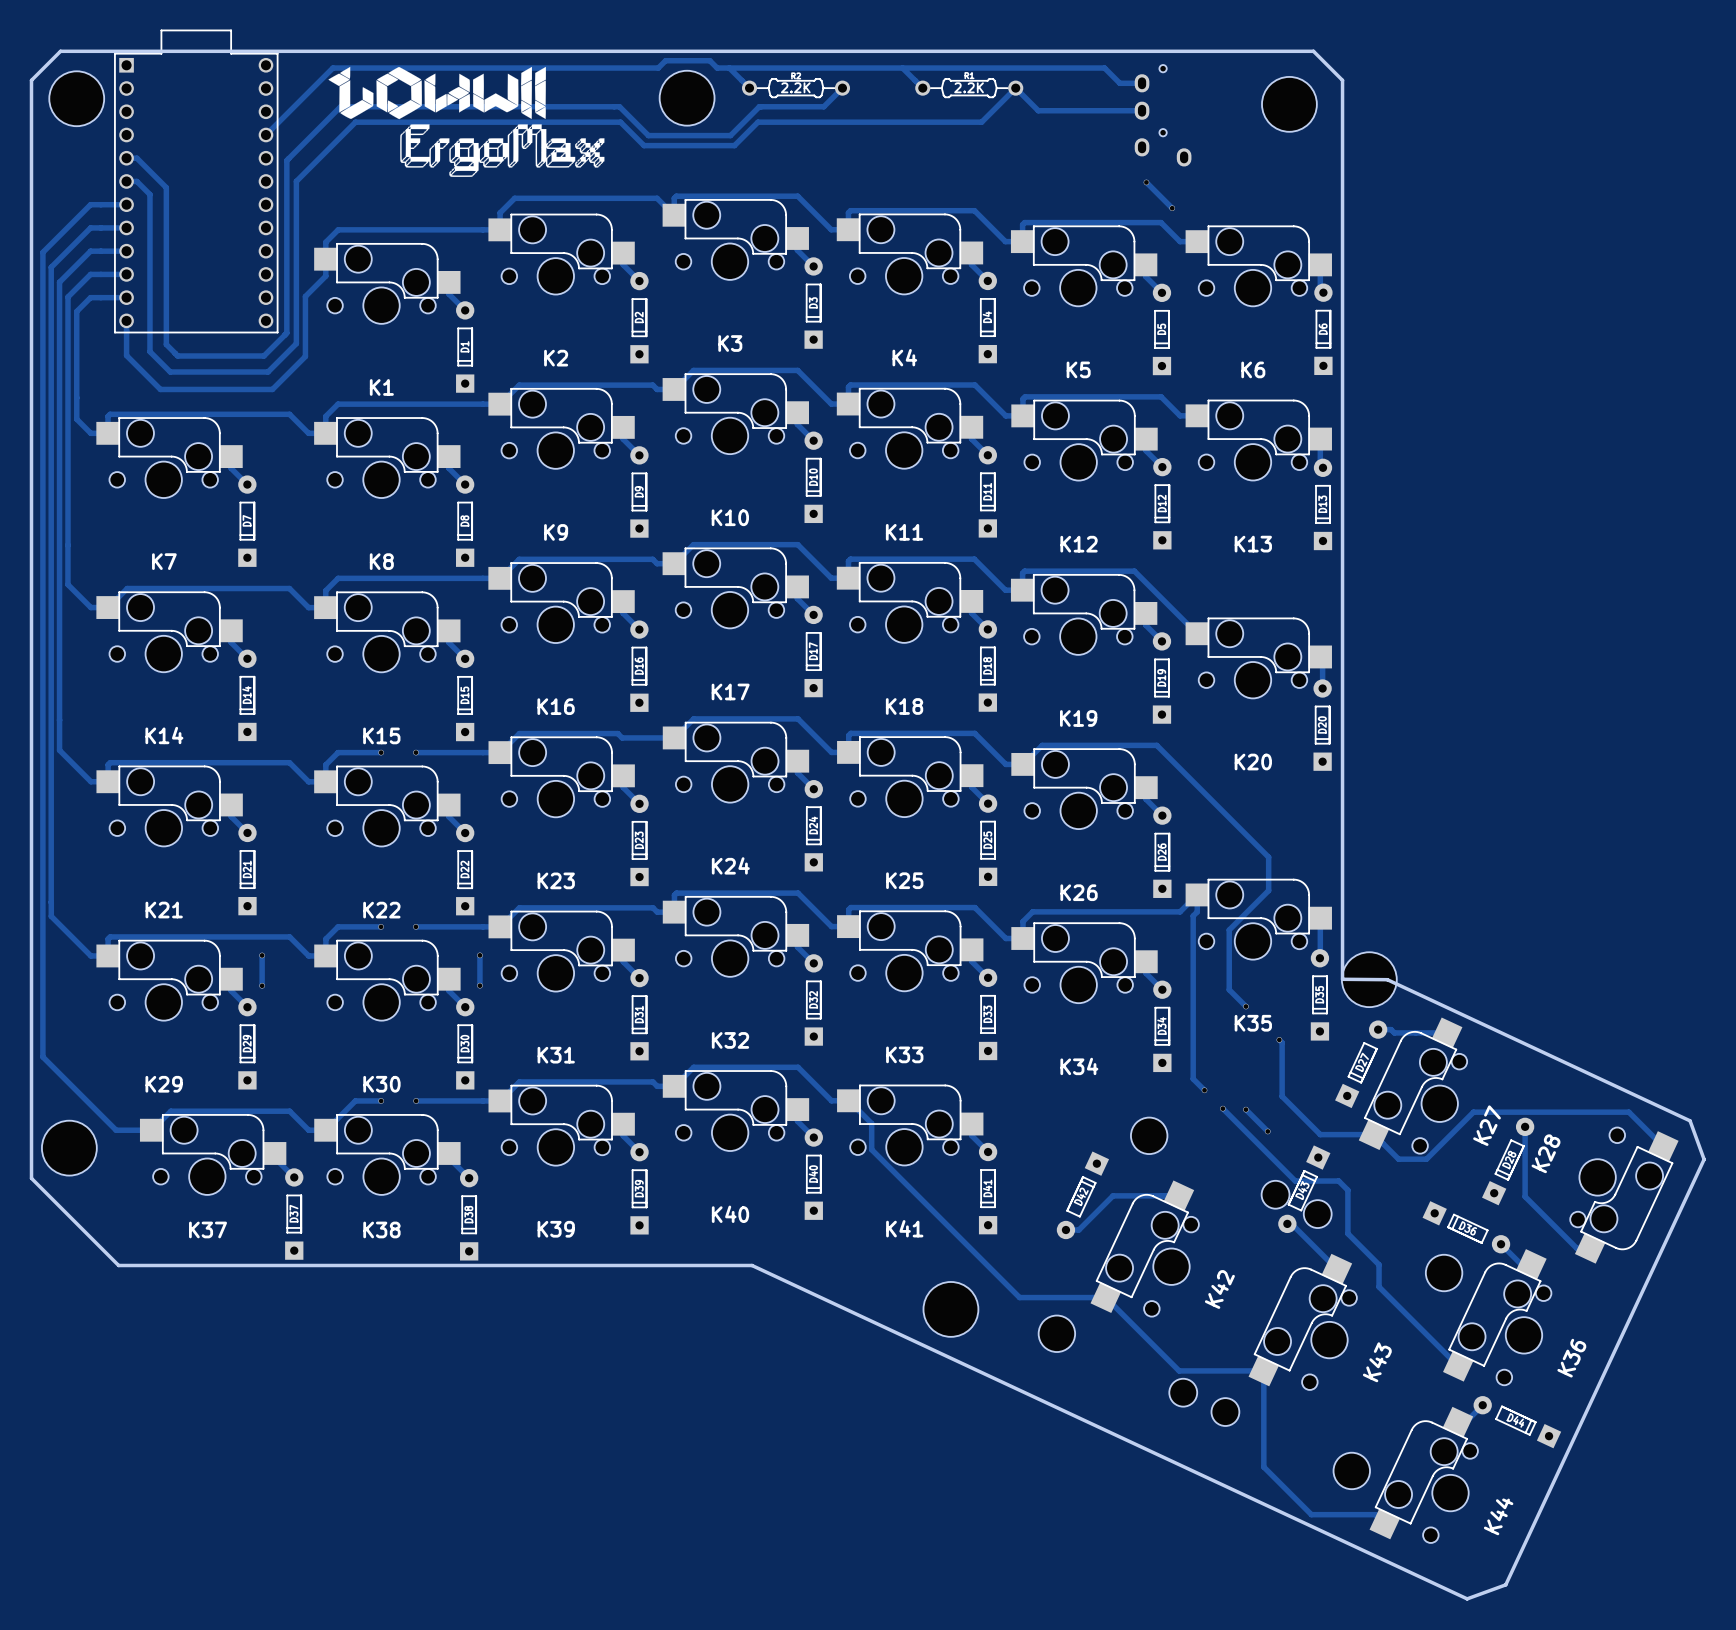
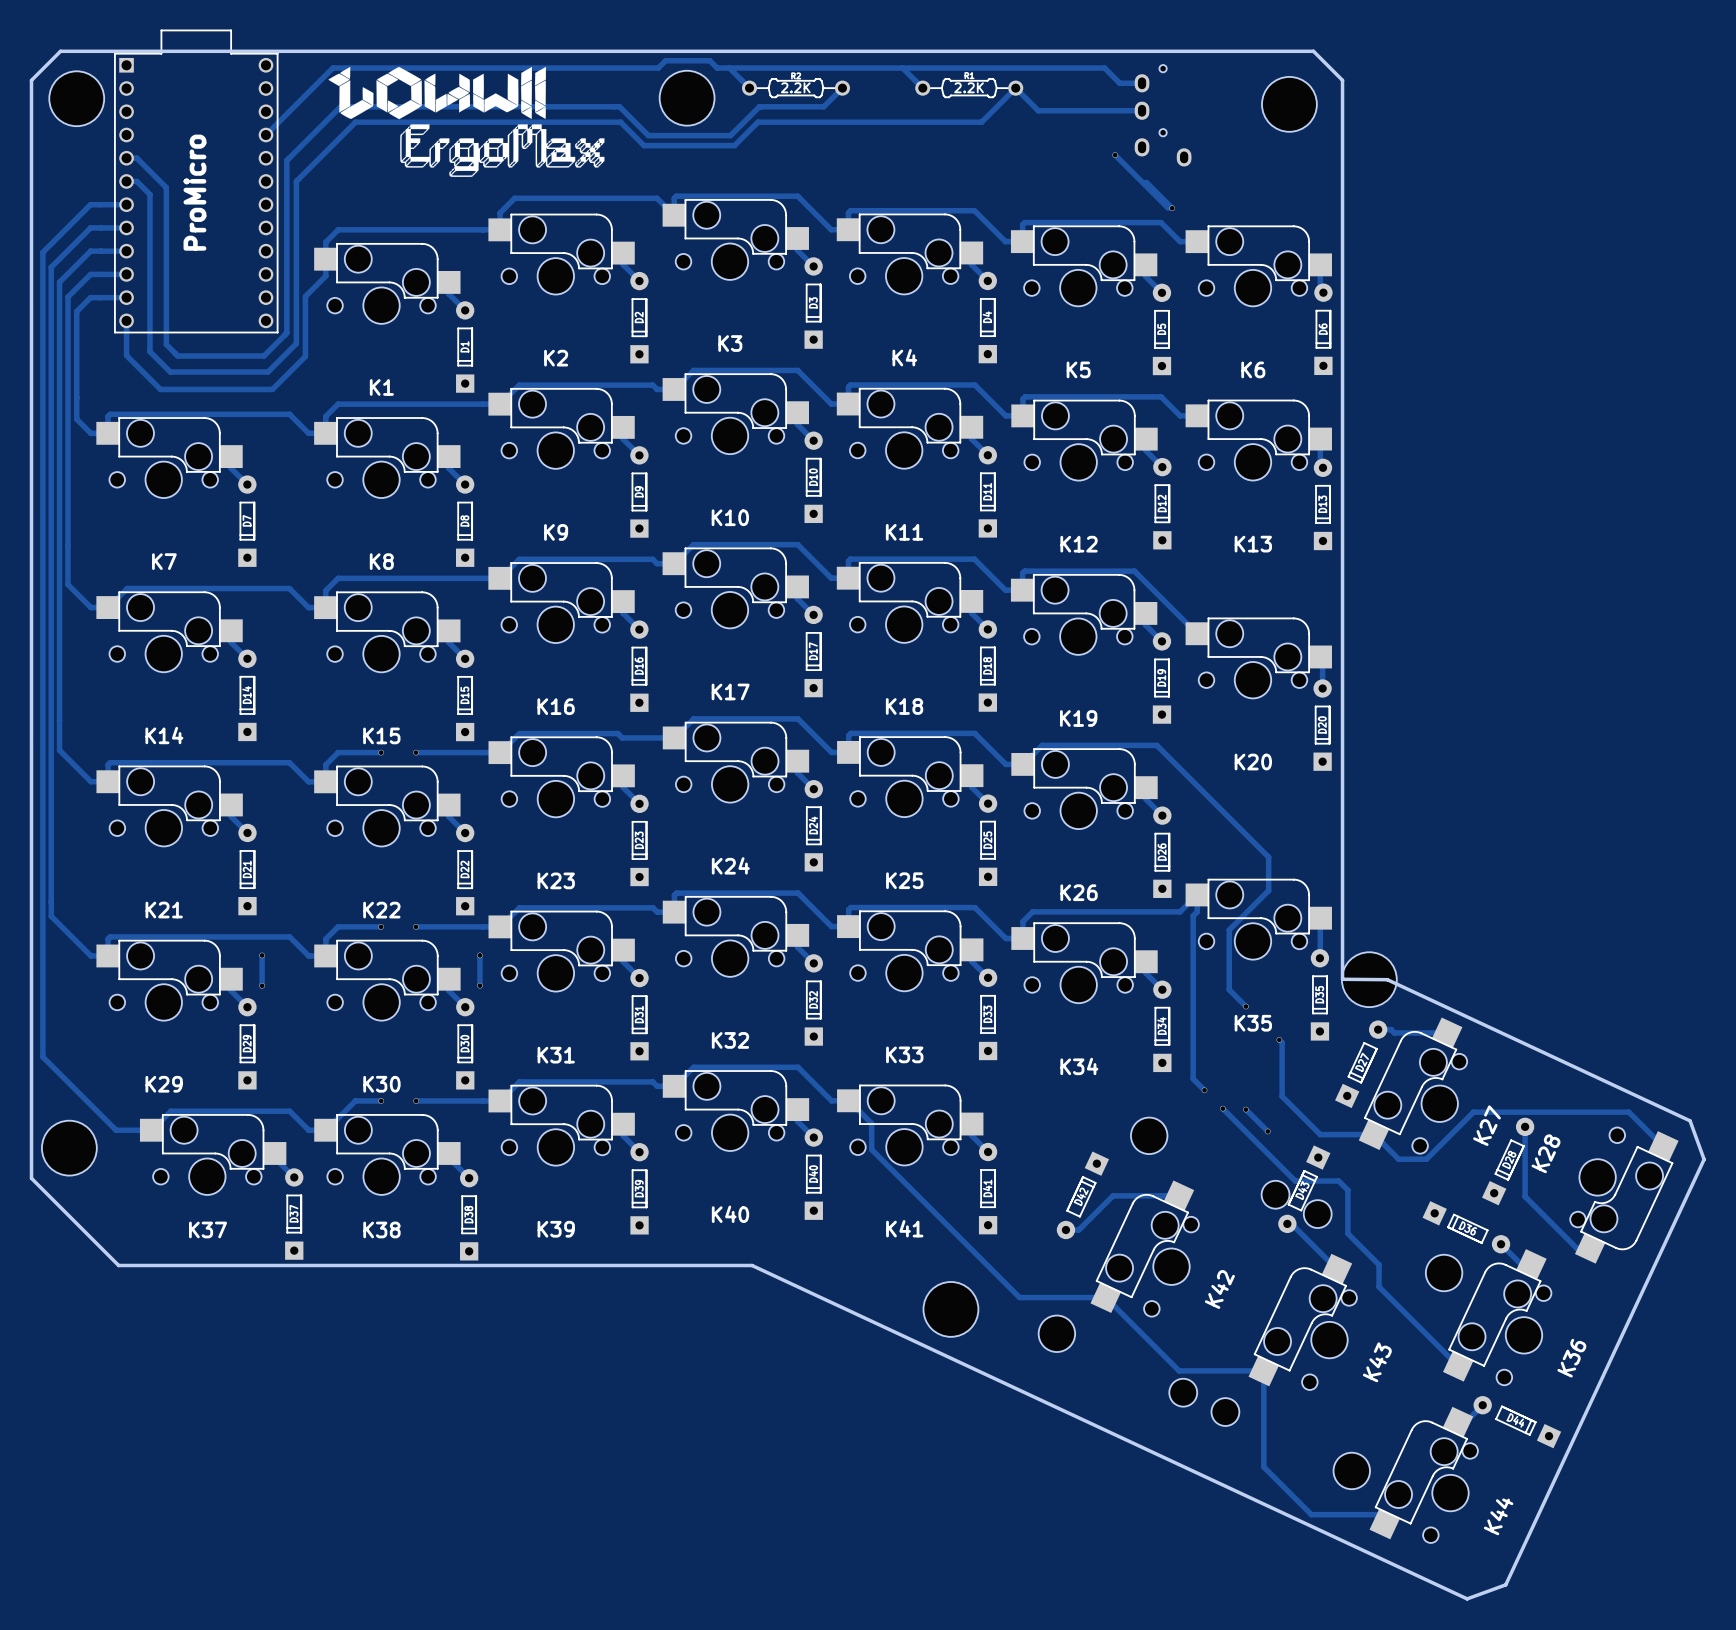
track: none -> (1115, 155) (1168, 208)
via position: (1146, 182) -> (1115, 155)
part value: none -> ProMicro (194, 192)

